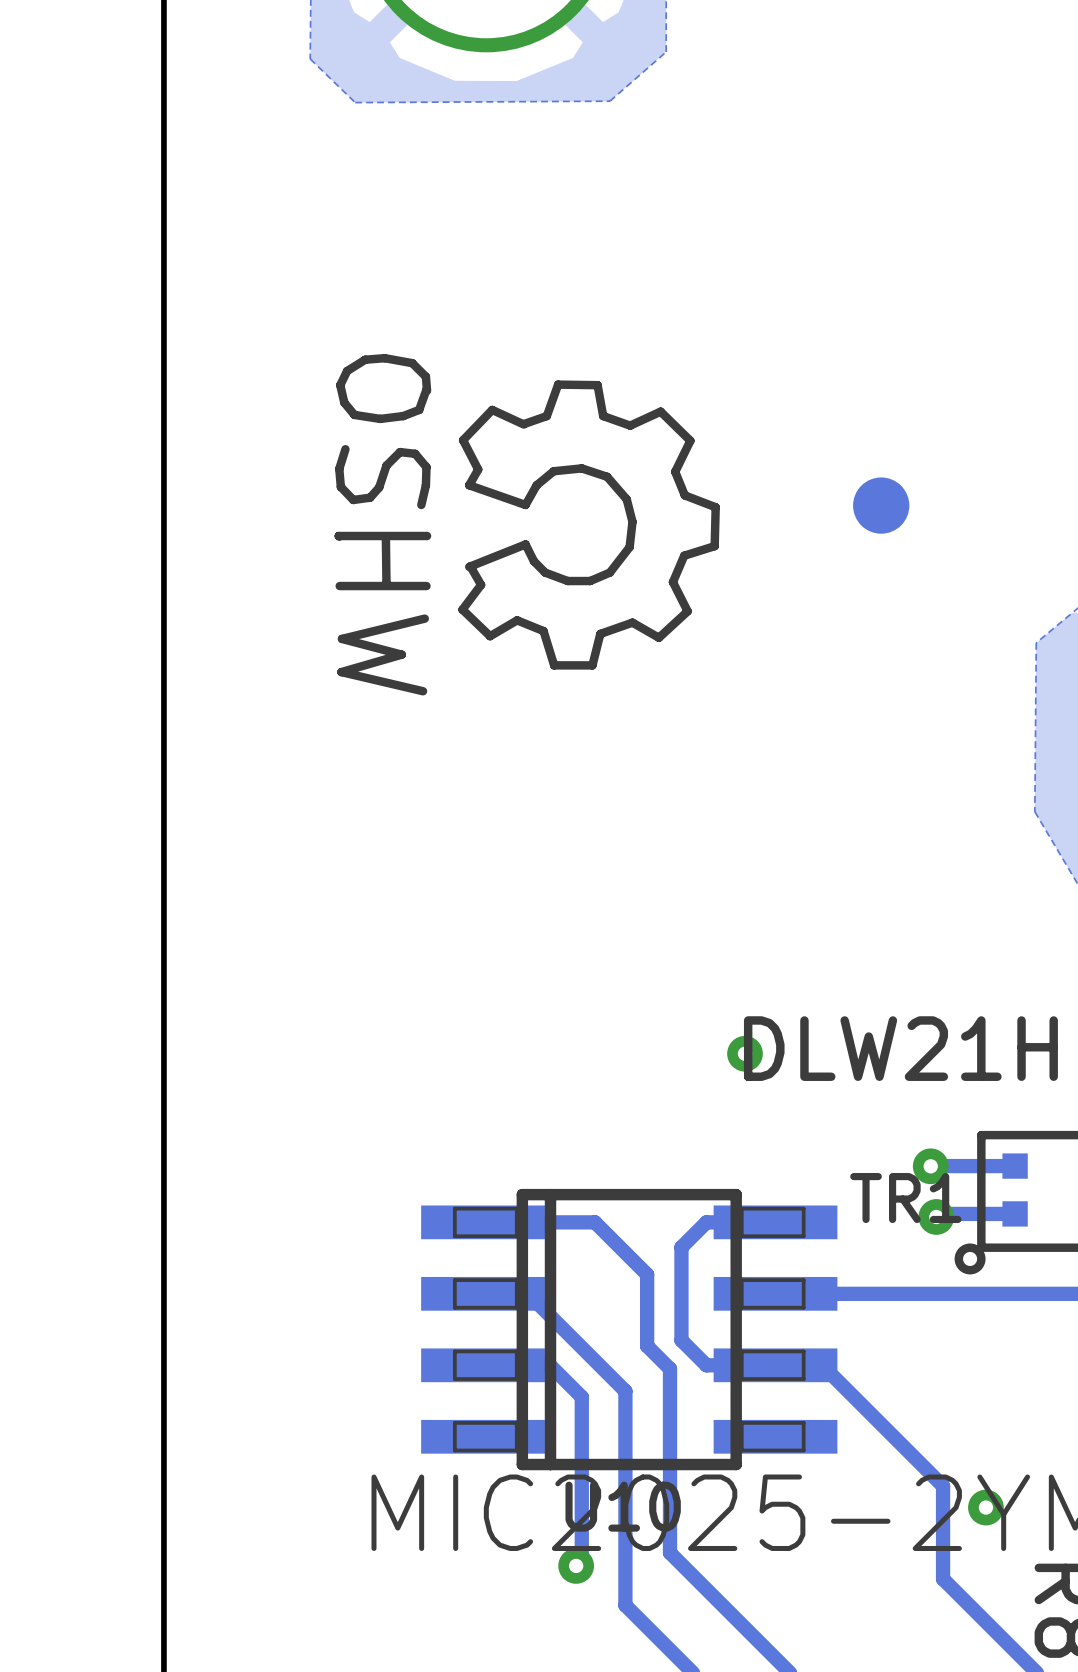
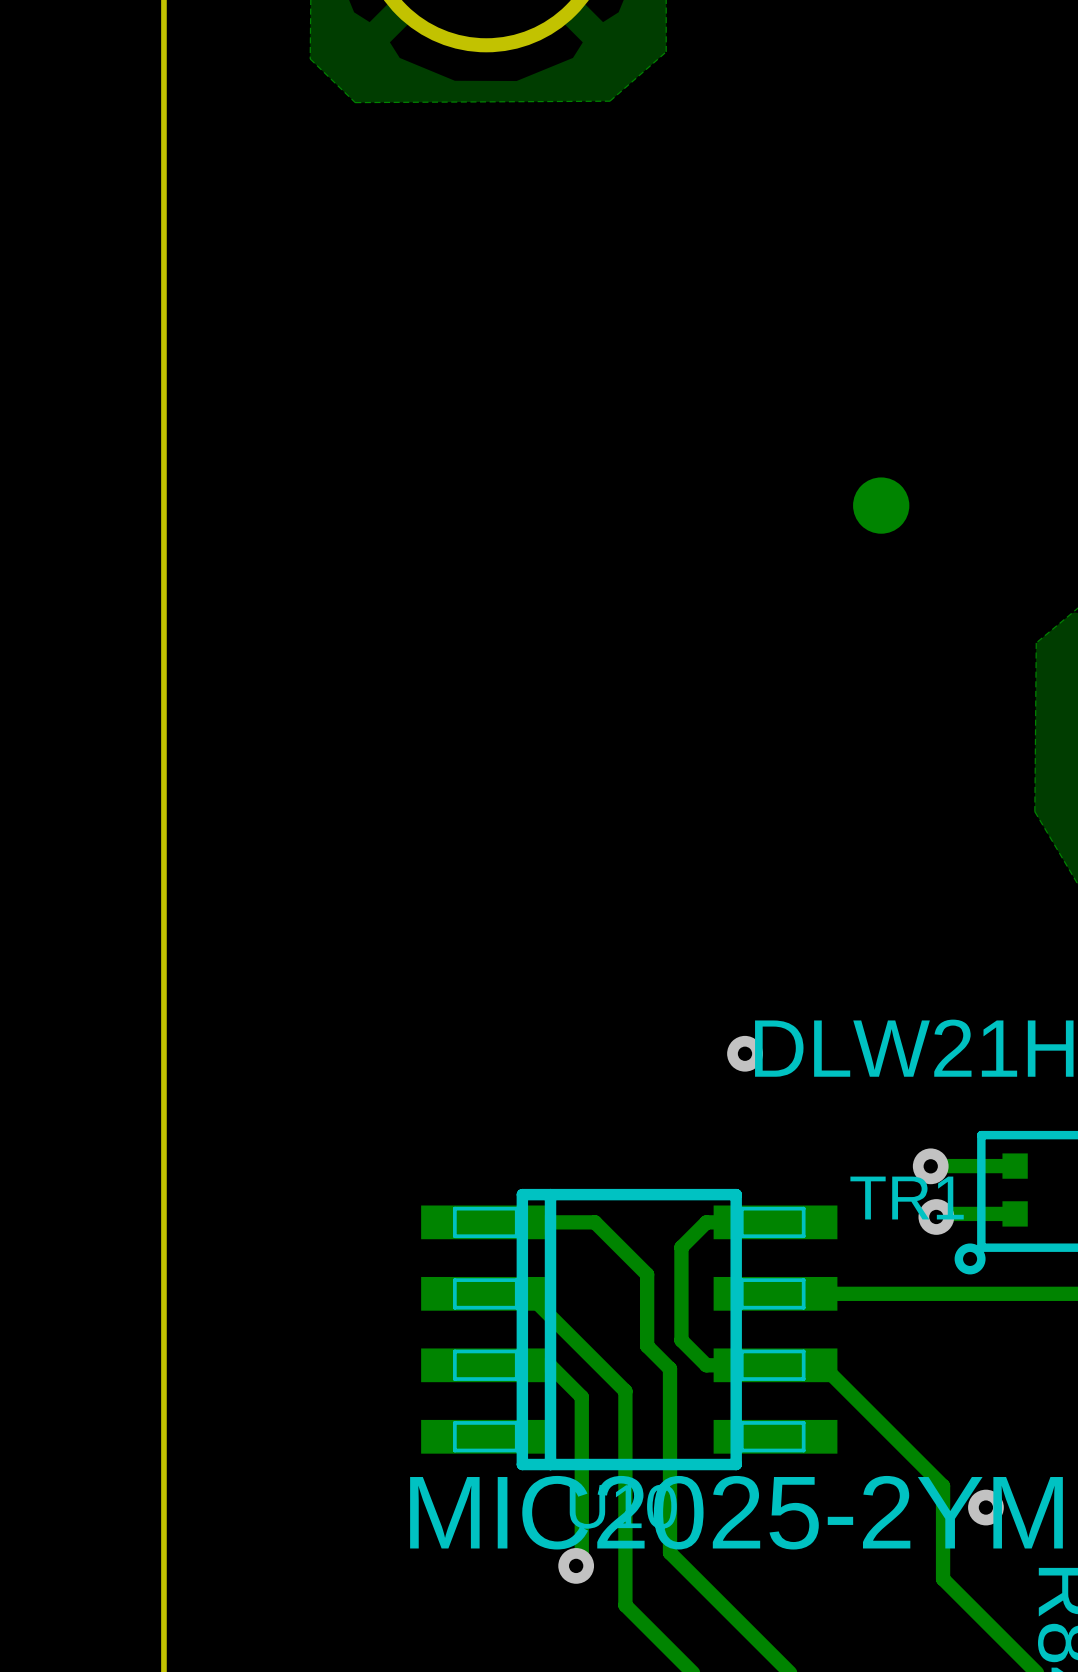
drawing: [334, 353, 720, 696] -> none

